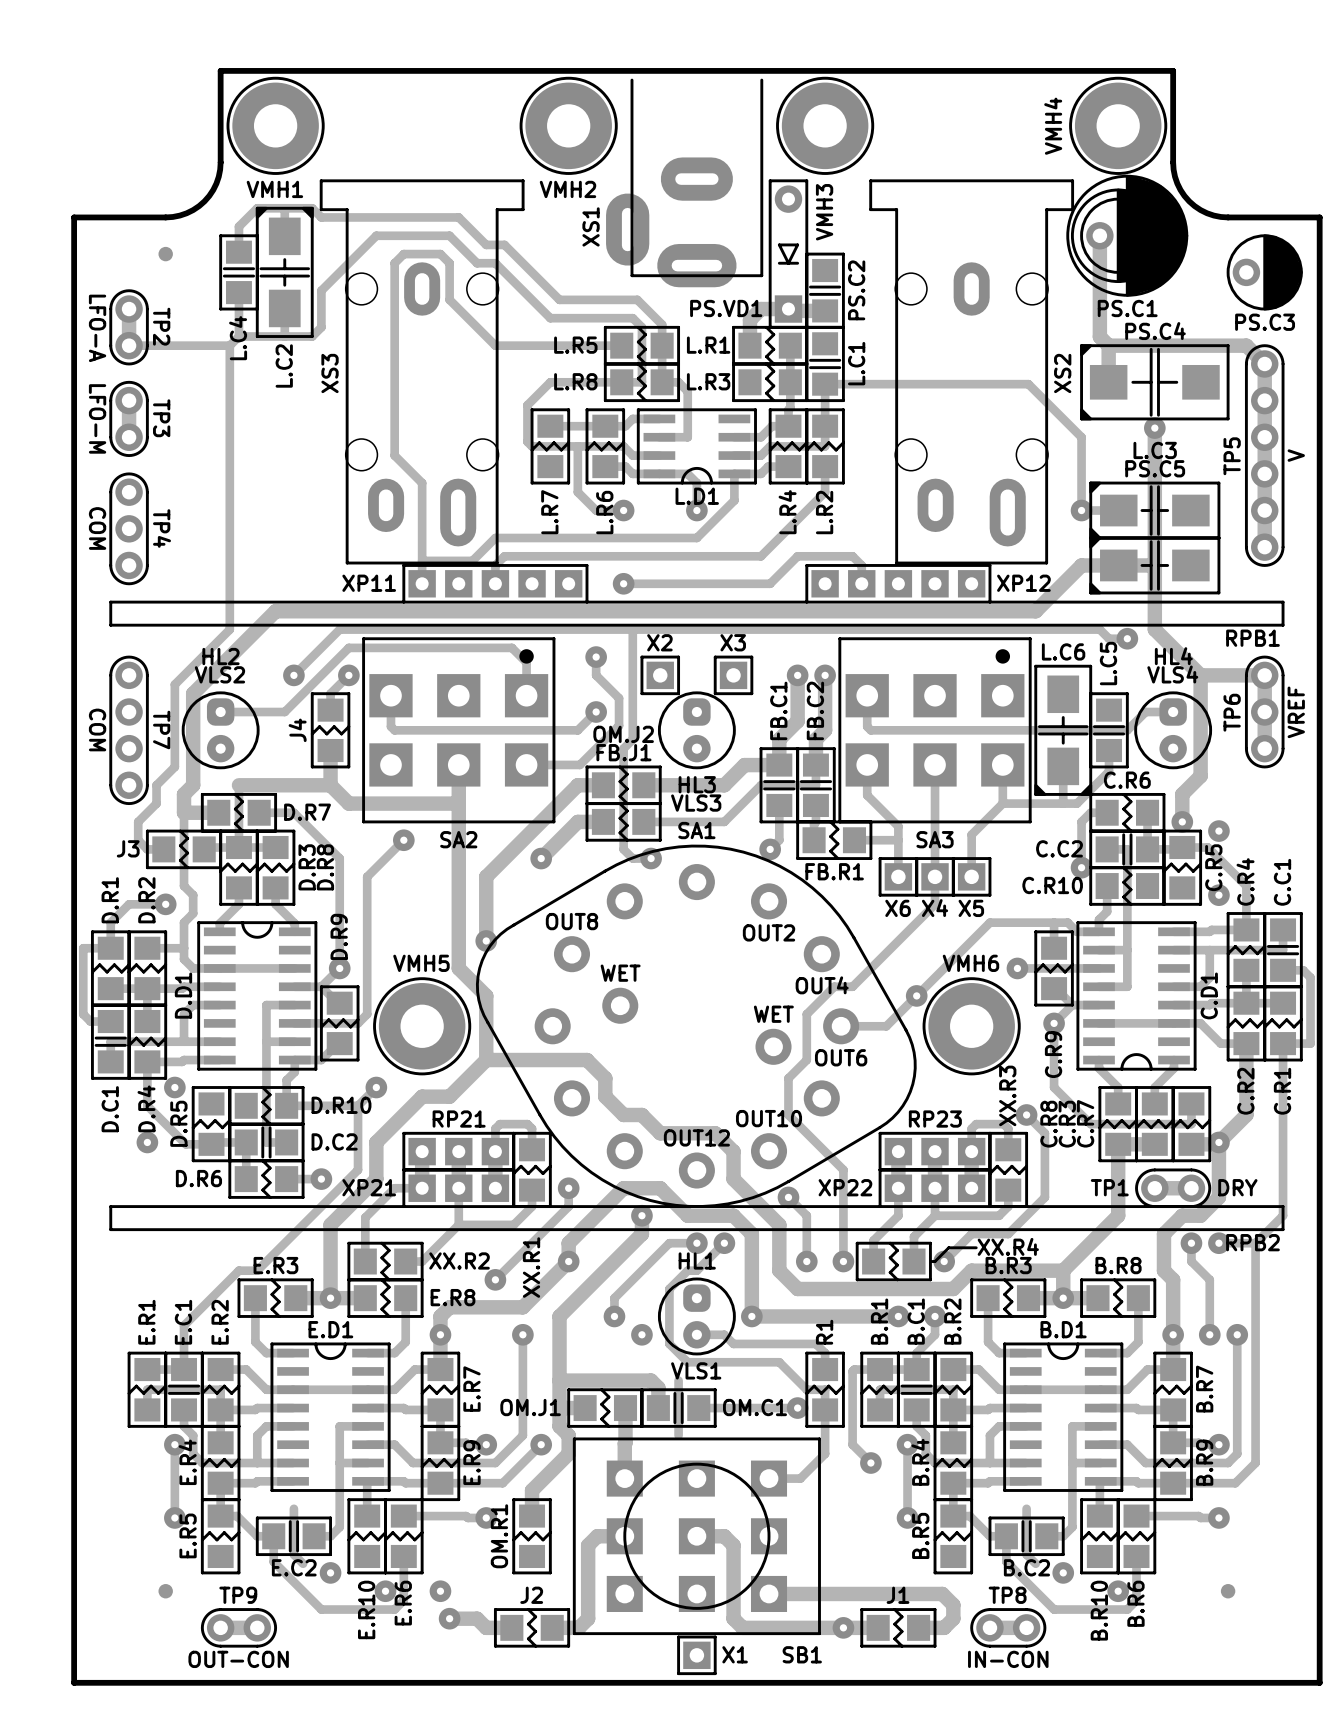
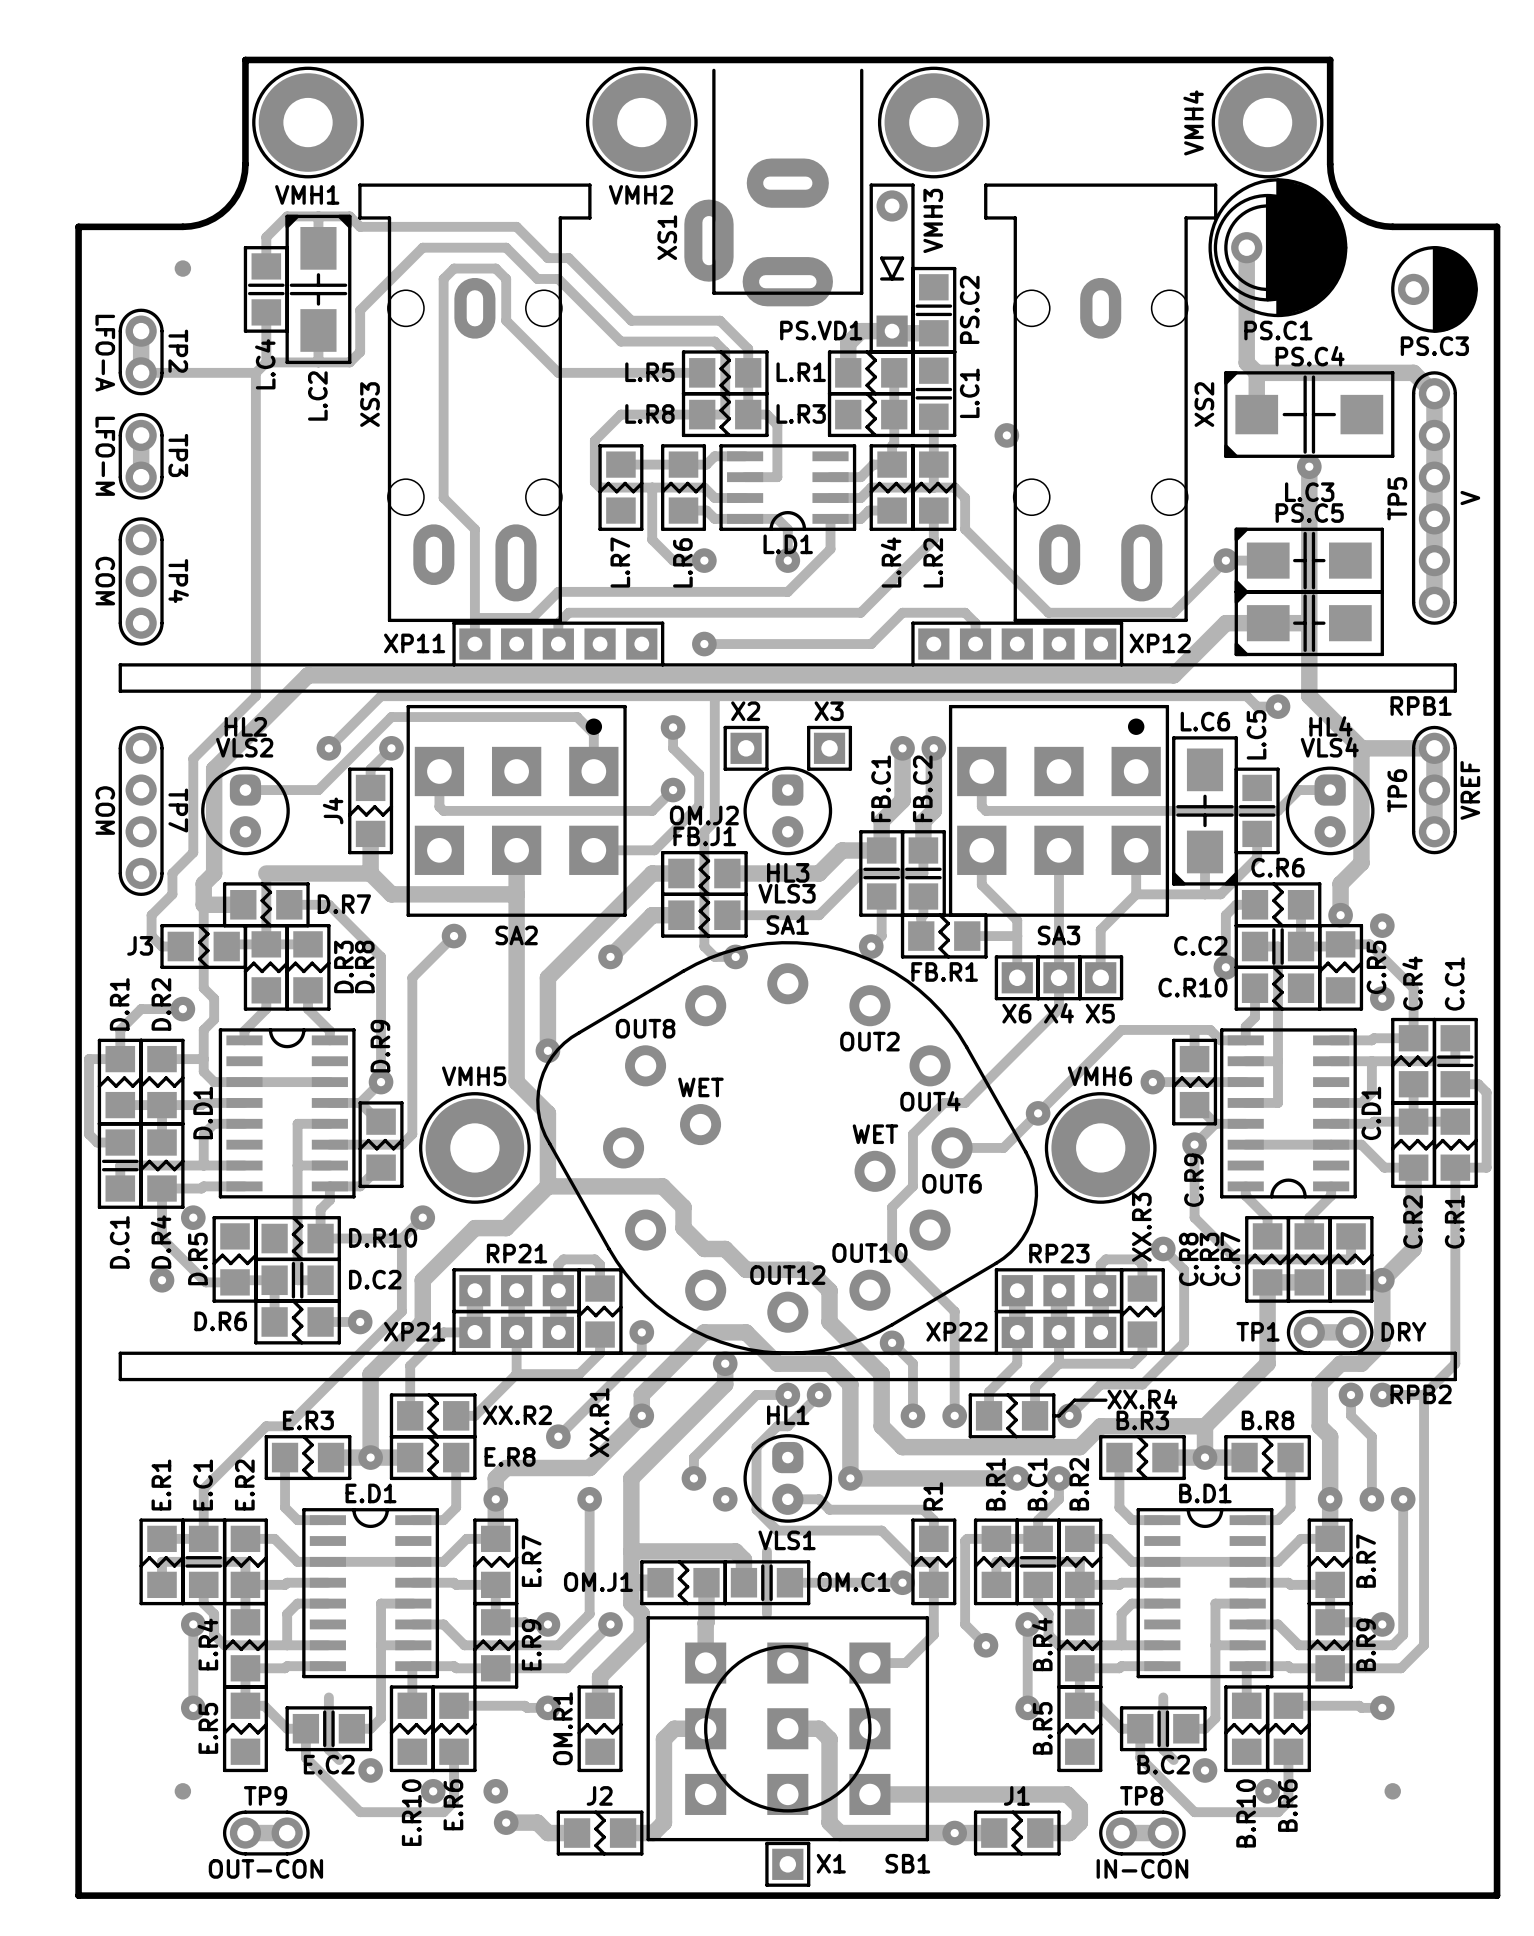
track: (825, 384) (1028, 384) (1081, 437) (1081, 510) -> (933, 487) (954, 487) (965, 498) (965, 529) (1048, 612) (1173, 612) (1225, 560)
via: none -> (1006, 435)

